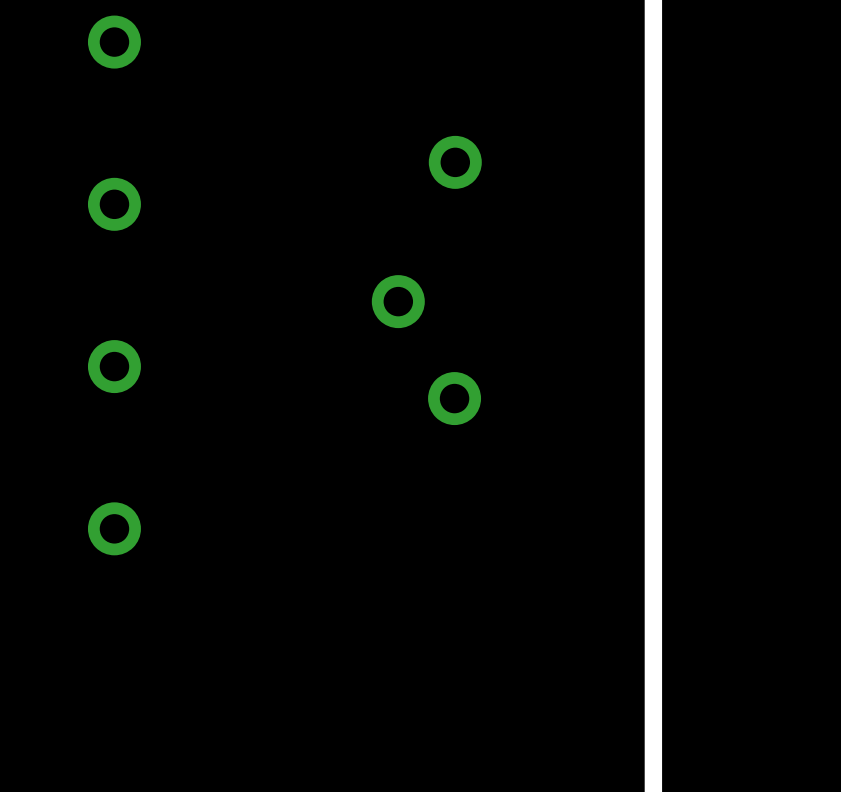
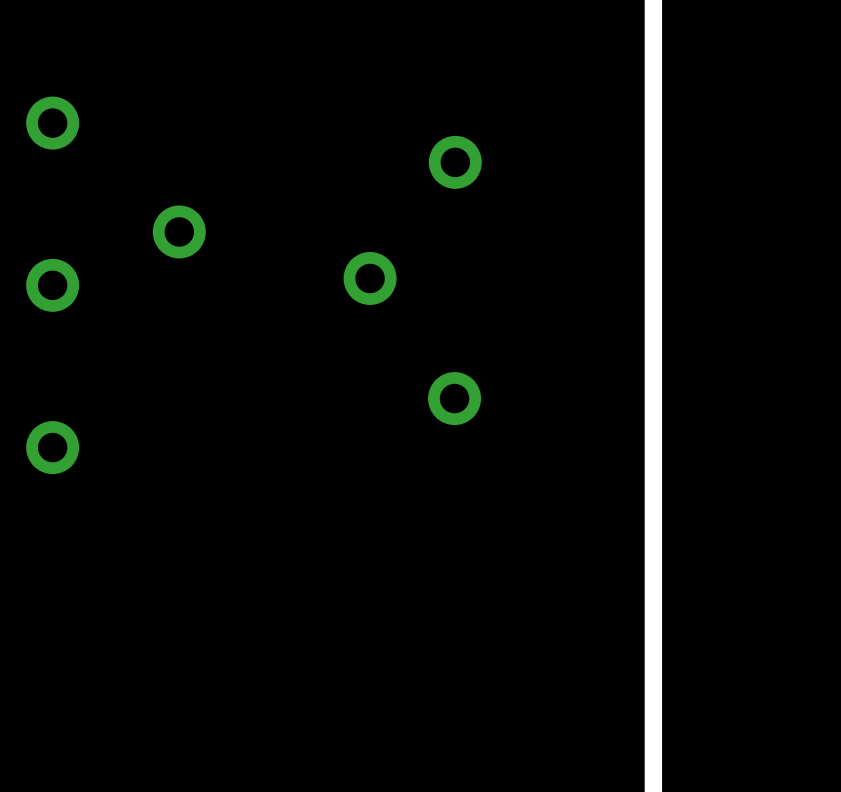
via: (114, 42) -> none
via: none -> (52, 123)
via: (114, 204) -> none
via: none -> (179, 231)
via: none -> (52, 285)
via position: (398, 301) -> (370, 278)
via: (114, 366) -> none
via: none -> (52, 447)
via: (114, 528) -> none

